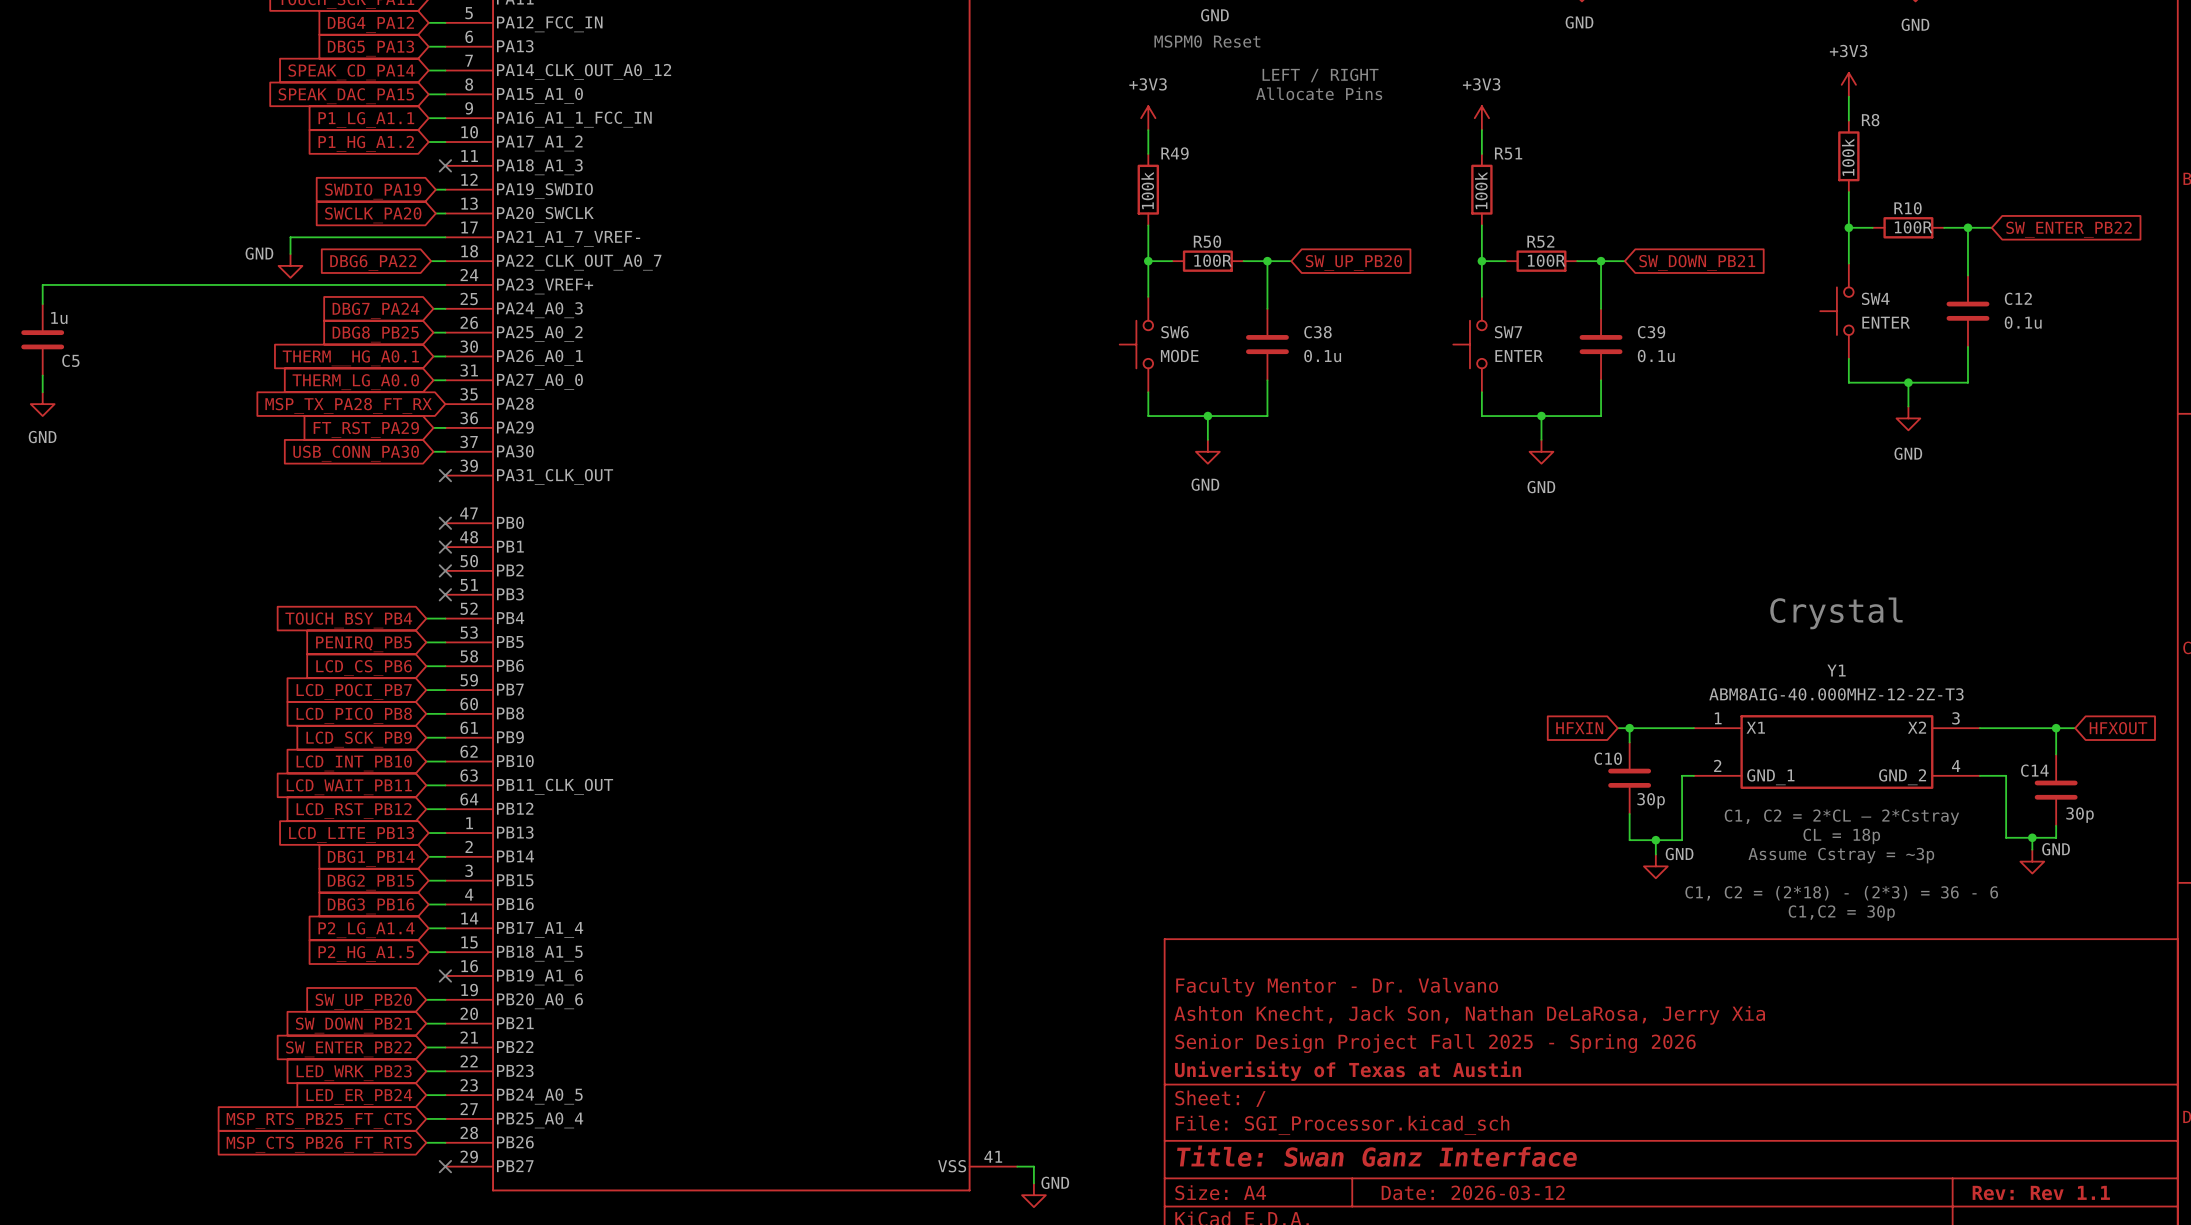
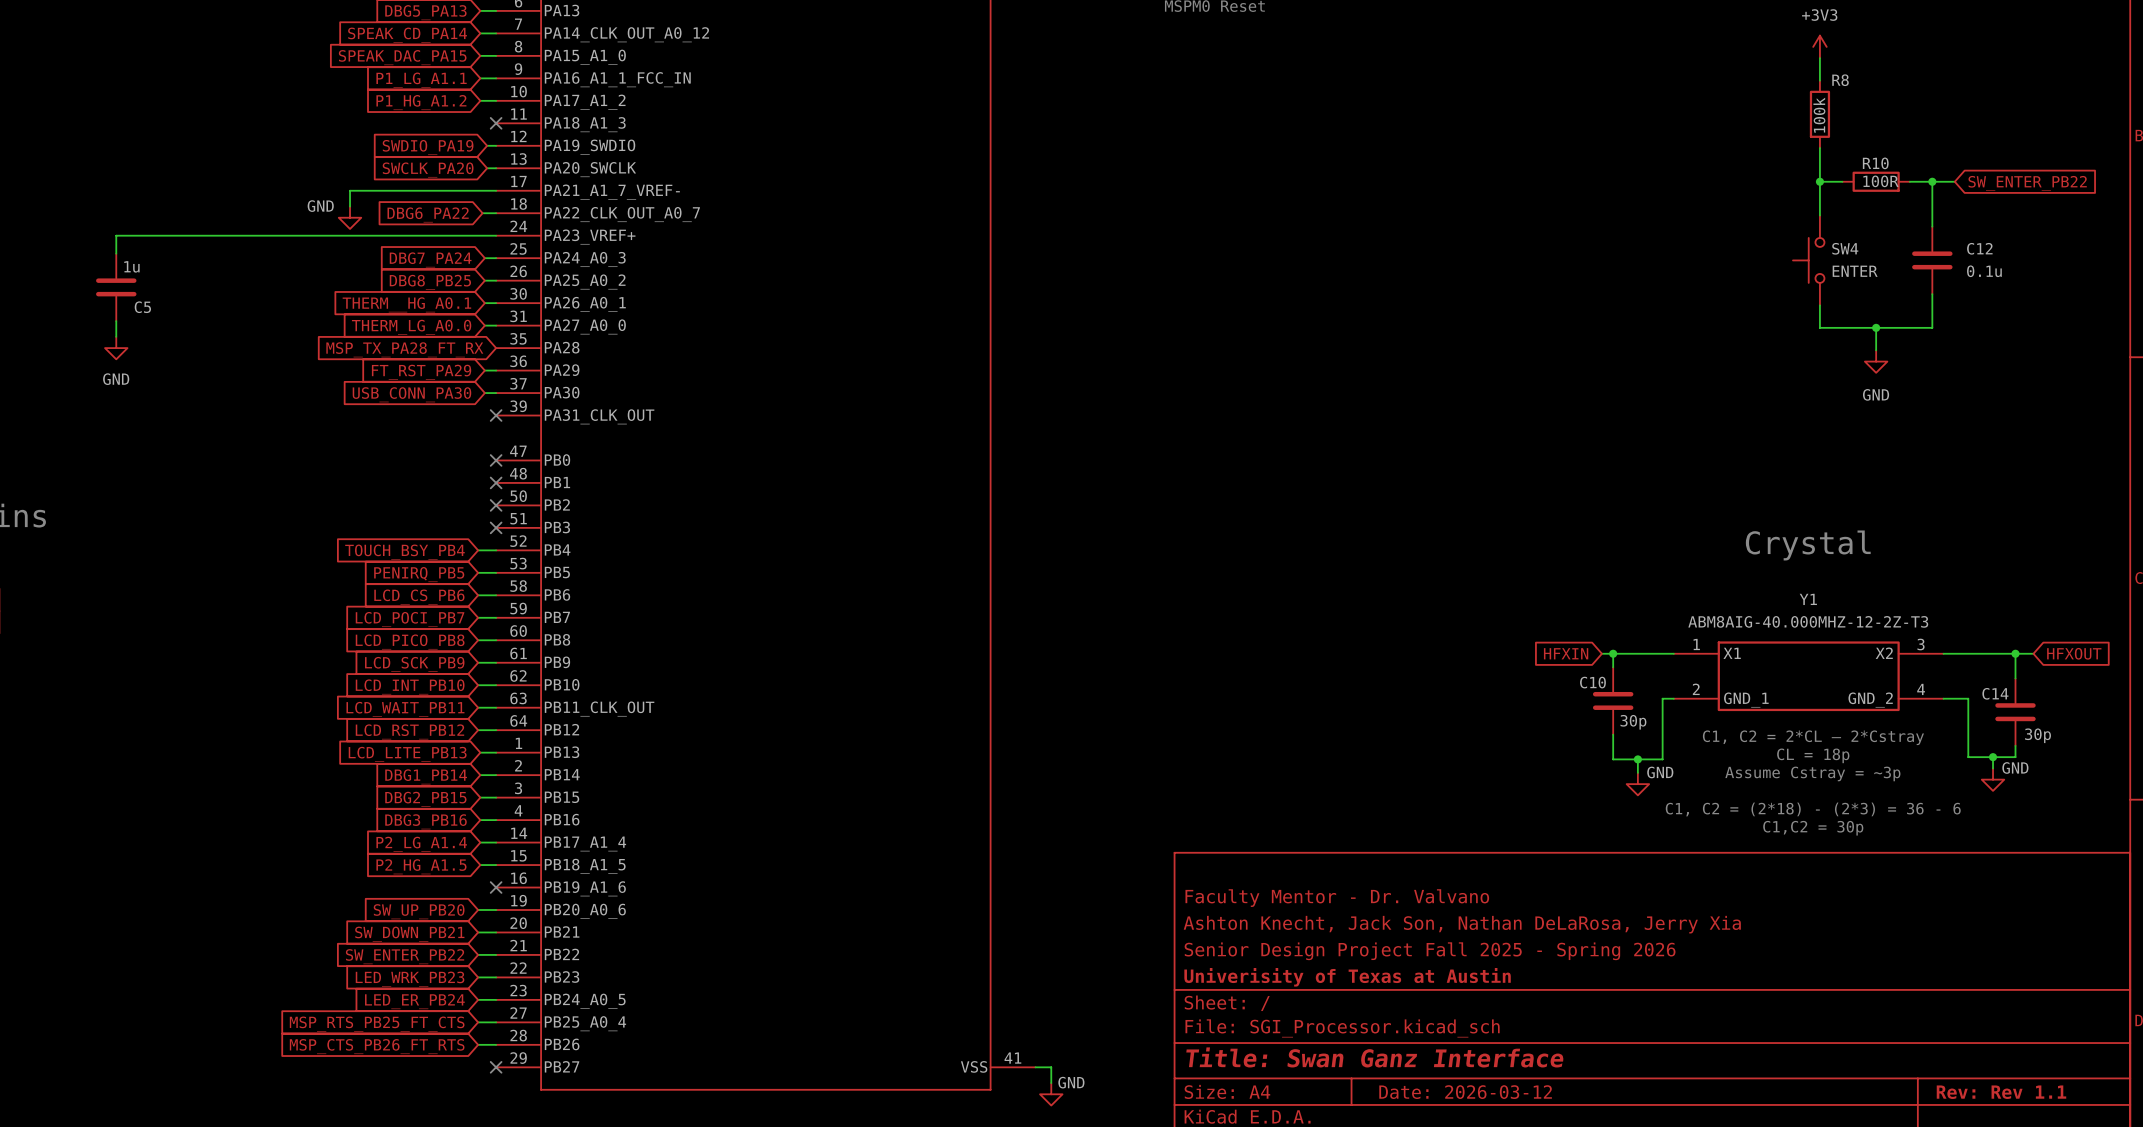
text: LEFT / RIGHT (1320, 75) -> none
text: Allocate Pins (1319, 93) -> none
power symbol: +3V3 (1148, 118) -> none
power symbol: +3V3 (1481, 118) -> none
wire: (1148, 130) (1148, 153) -> none
wire: (1481, 130) (1481, 153) -> none
R49: 100k (1148, 189) -> none
R51: 100k (1481, 189) -> none
wire: (1148, 225) (1148, 296) -> none
wire: (1481, 225) (1481, 296) -> none
wire: (1148, 261) (1172, 261) -> none
junction: (1148, 261) -> none
R50: 100R (1207, 261) -> none
wire: (1243, 261) (1291, 261) -> none
wire: (1267, 261) (1267, 308) -> none
junction: (1267, 261) -> none
wire: (1481, 261) (1505, 261) -> none
junction: (1481, 261) -> none
R52: 100R (1541, 261) -> none
wire: (1577, 261) (1624, 261) -> none
wire: (1601, 261) (1601, 308) -> none
junction: (1601, 261) -> none
global label: SW_UP_PB20 (1353, 262) -> none
global label: SW_DOWN_PB21 (1697, 262) -> none
SW6: MODE (1136, 344) -> none
C38: 0.1u (1267, 344) -> none
SW7: ENTER (1469, 344) -> none
C39: 0.1u (1601, 344) -> none
wire: (1267, 380) (1267, 416) (1148, 416) (1148, 392) -> none
wire: (1601, 380) (1601, 416) (1481, 416) (1481, 392) -> none
wire: (1207, 416) (1207, 439) -> none
junction: (1207, 416) -> none
wire: (1541, 416) (1541, 439) -> none
junction: (1541, 416) -> none
power symbol: GND (1207, 451) -> none
power symbol: GND (1541, 451) -> none

